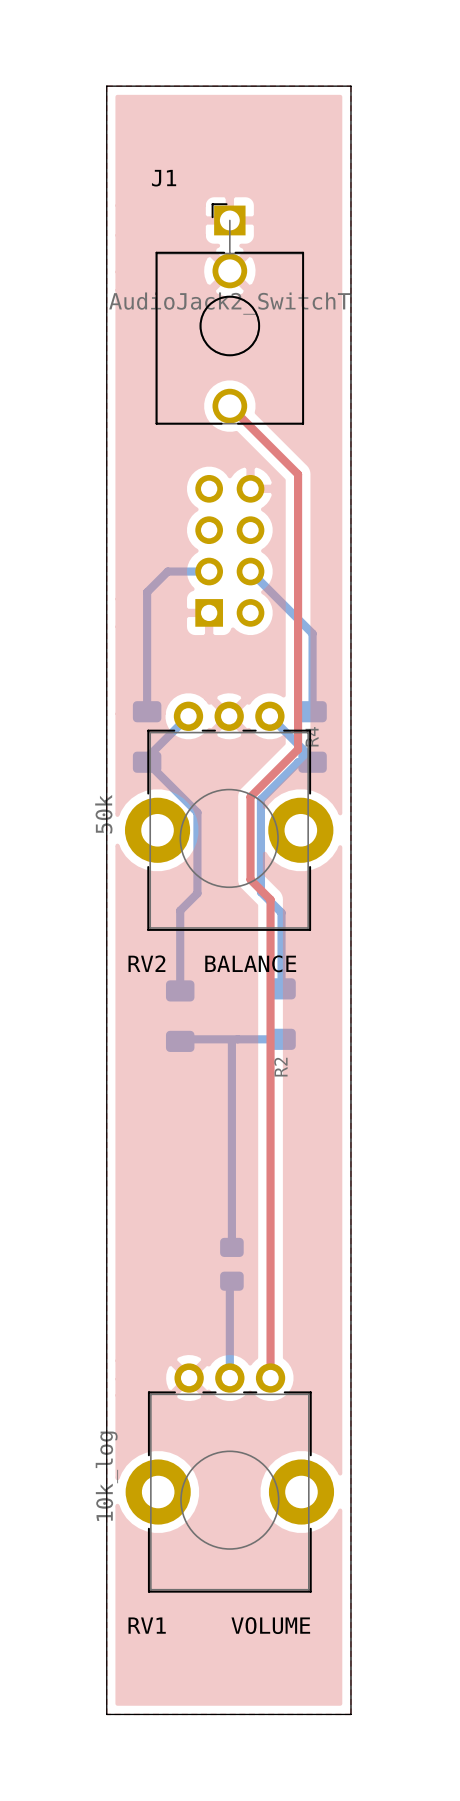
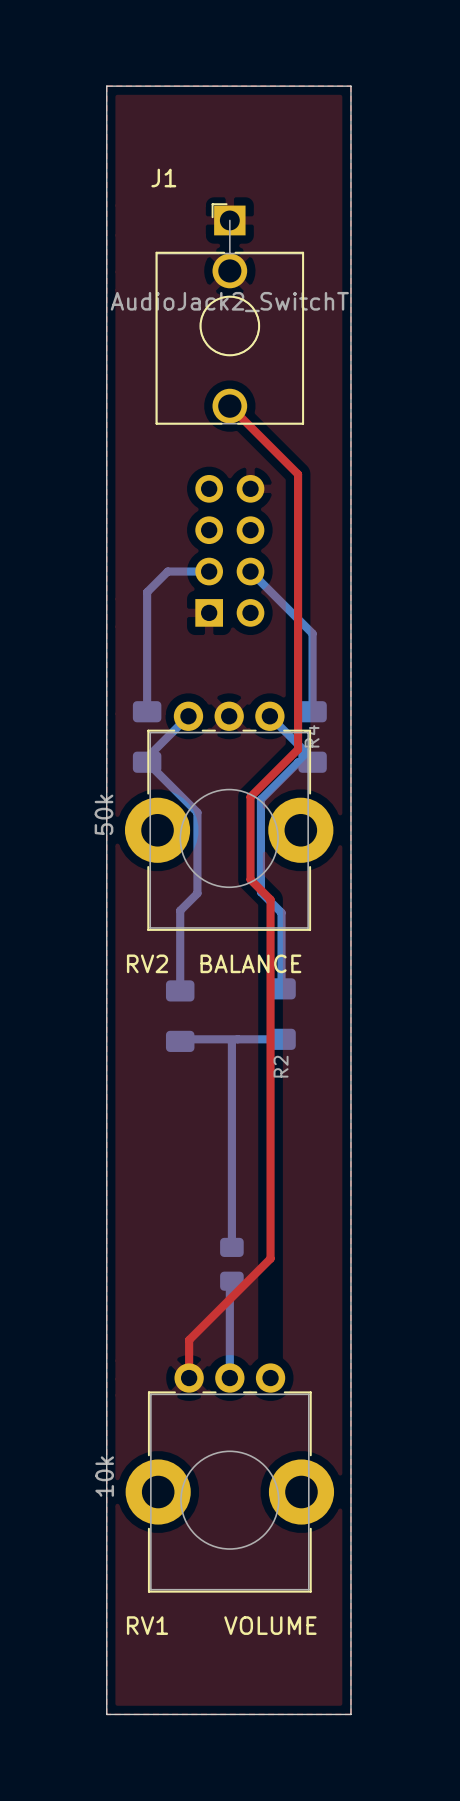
top track: (270, 1258) (270, 1378) -> (270, 1258) (189, 1340) (189, 1378)
RV1 value: 10k_log (106, 1476) -> 10k (104, 1476)

